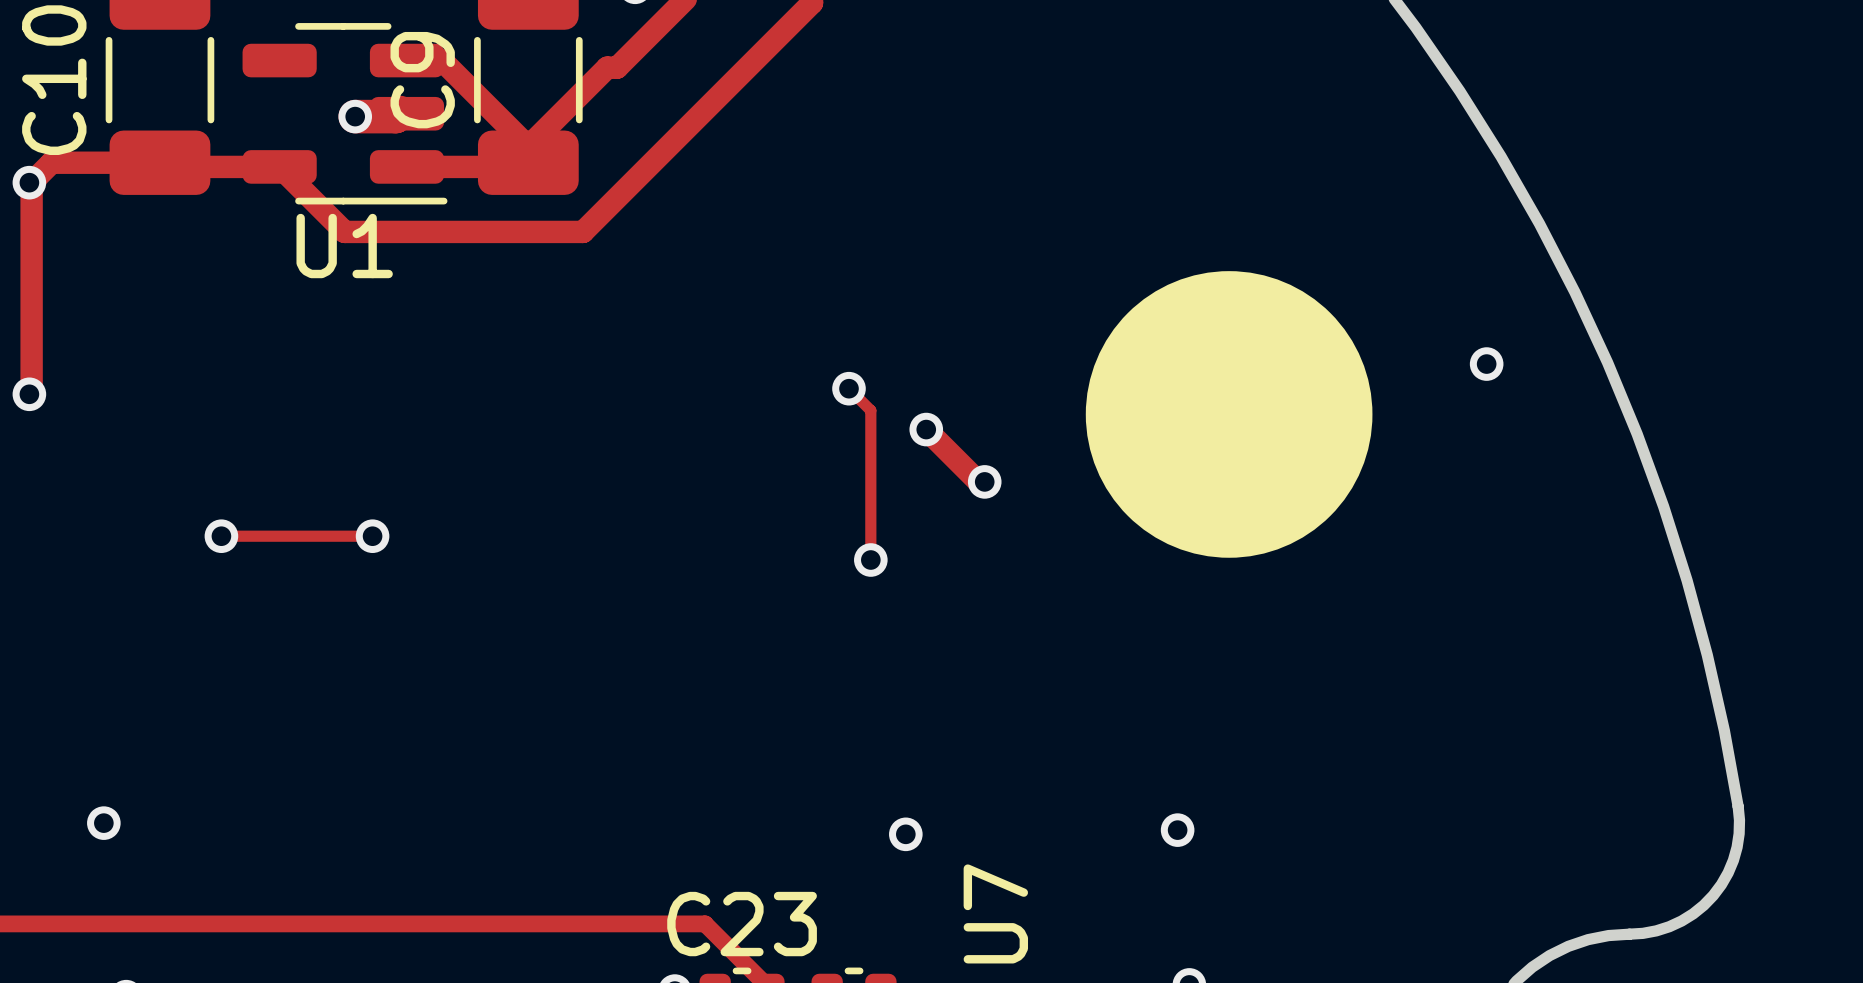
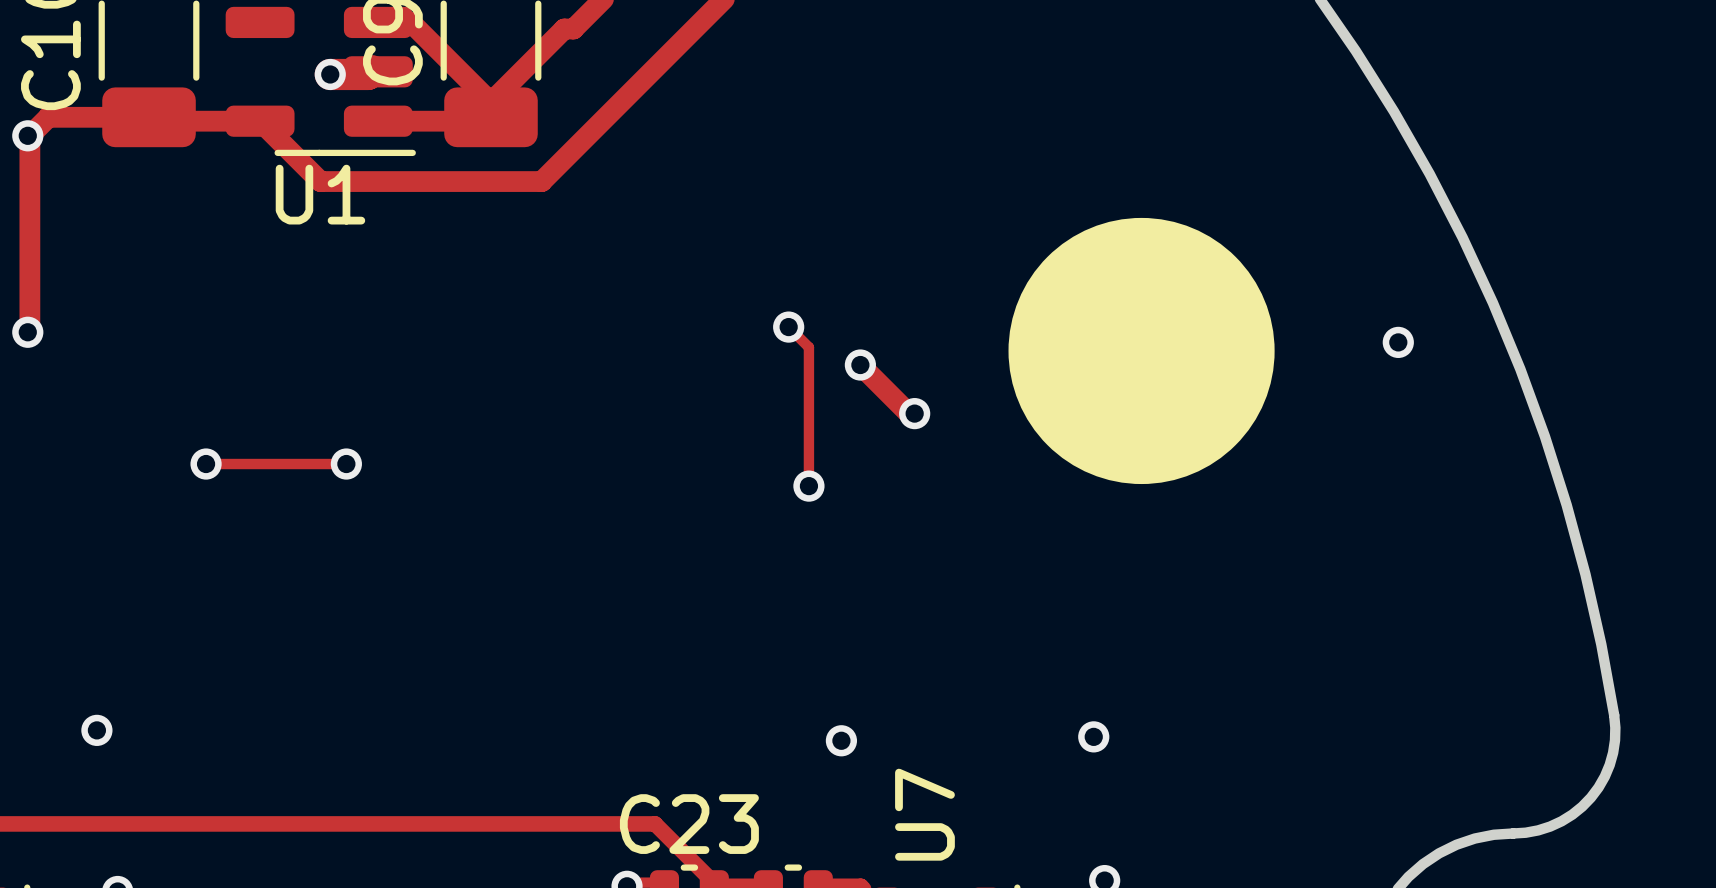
via position: (1486, 364) -> (1398, 342)

